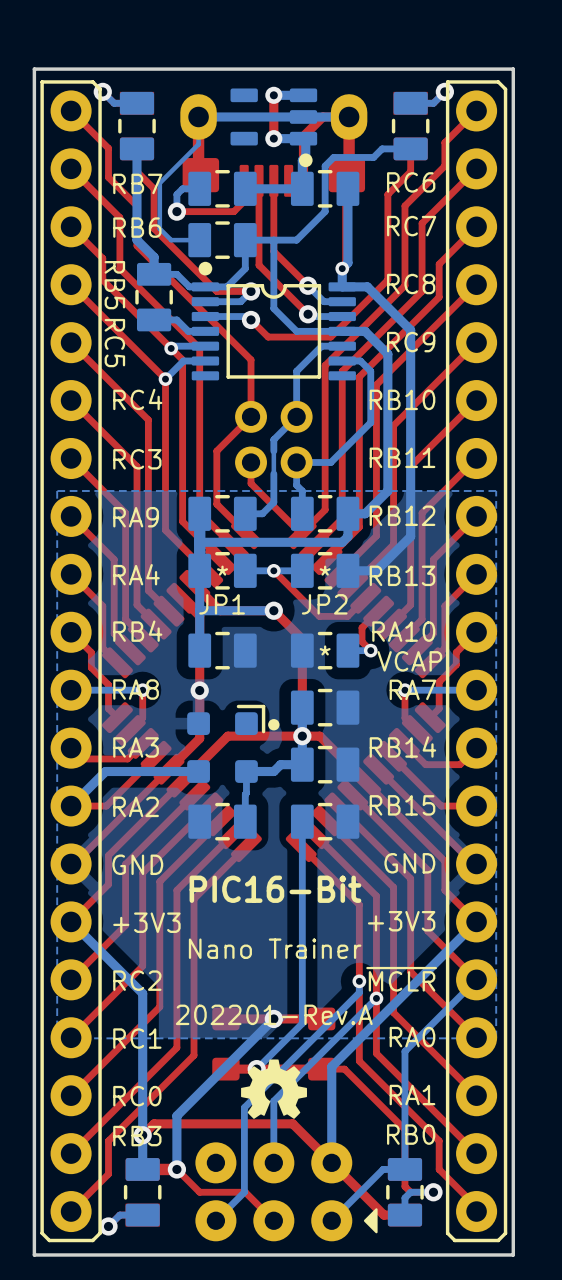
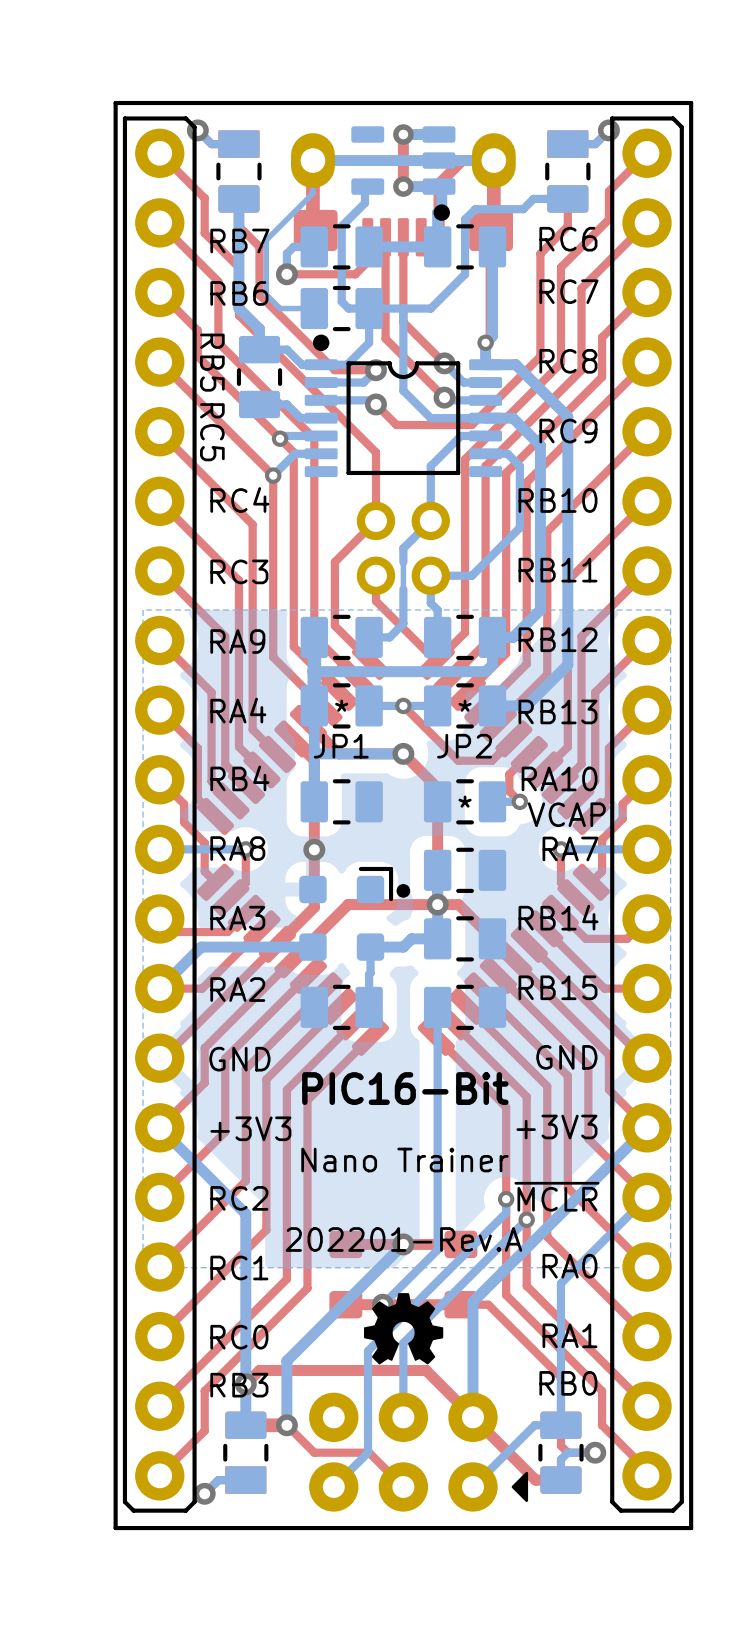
bottom track: none -> (365, 186) (365, 203) (341, 226) (341, 301) (348, 308) (369, 308)

